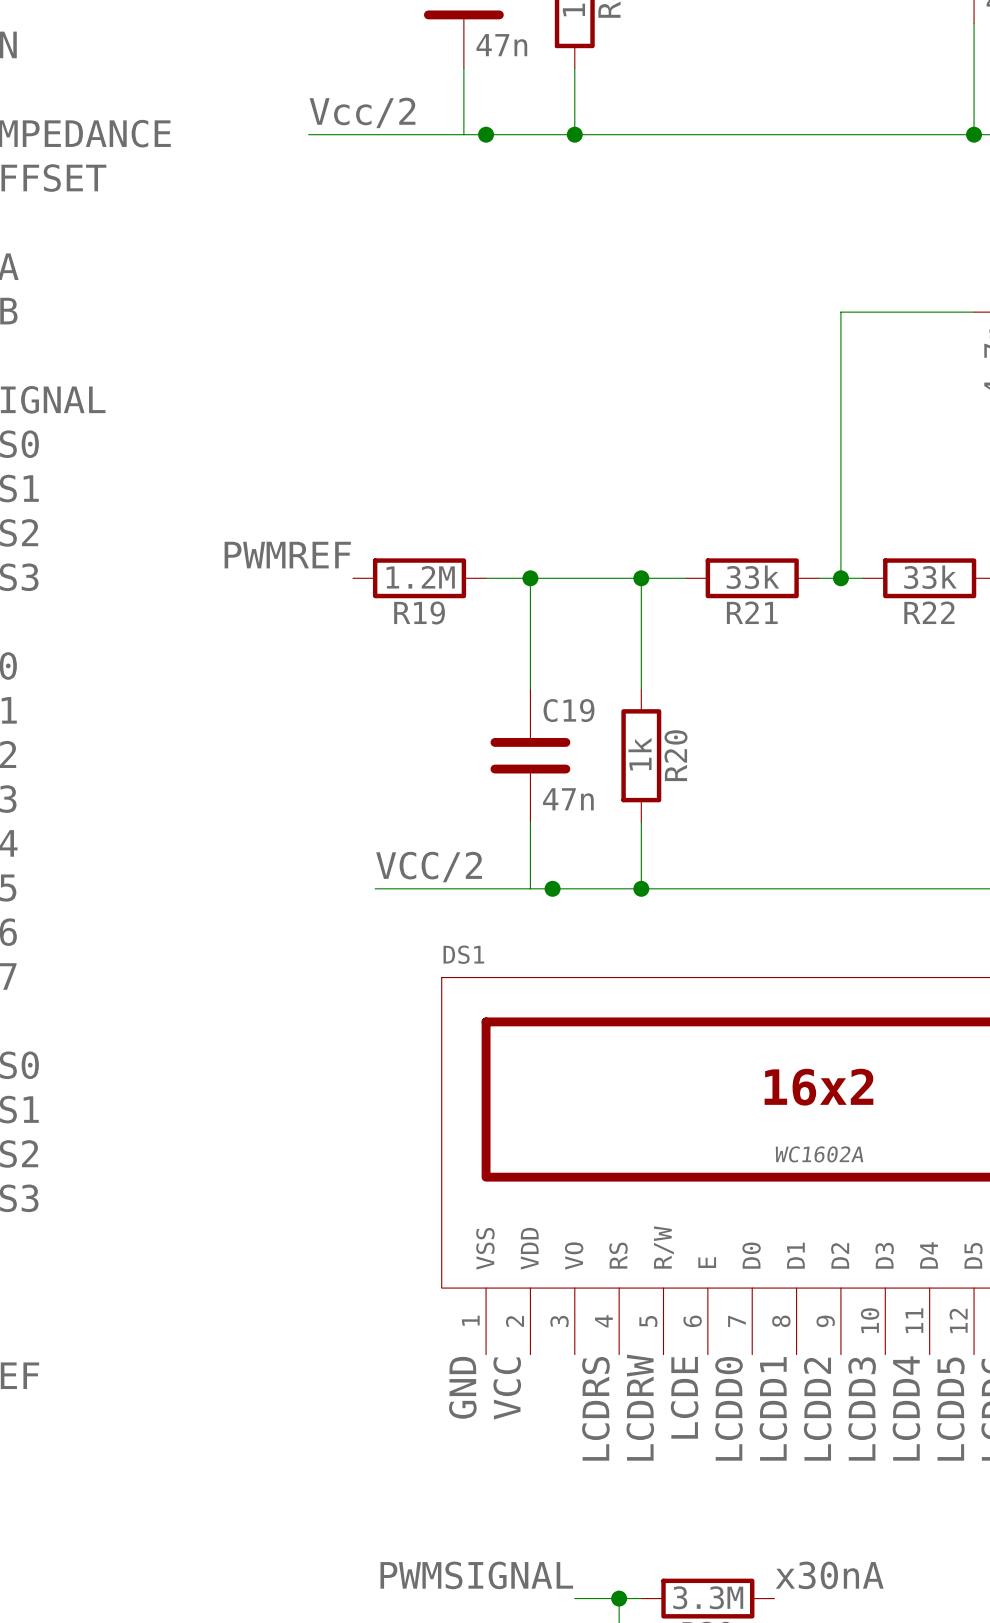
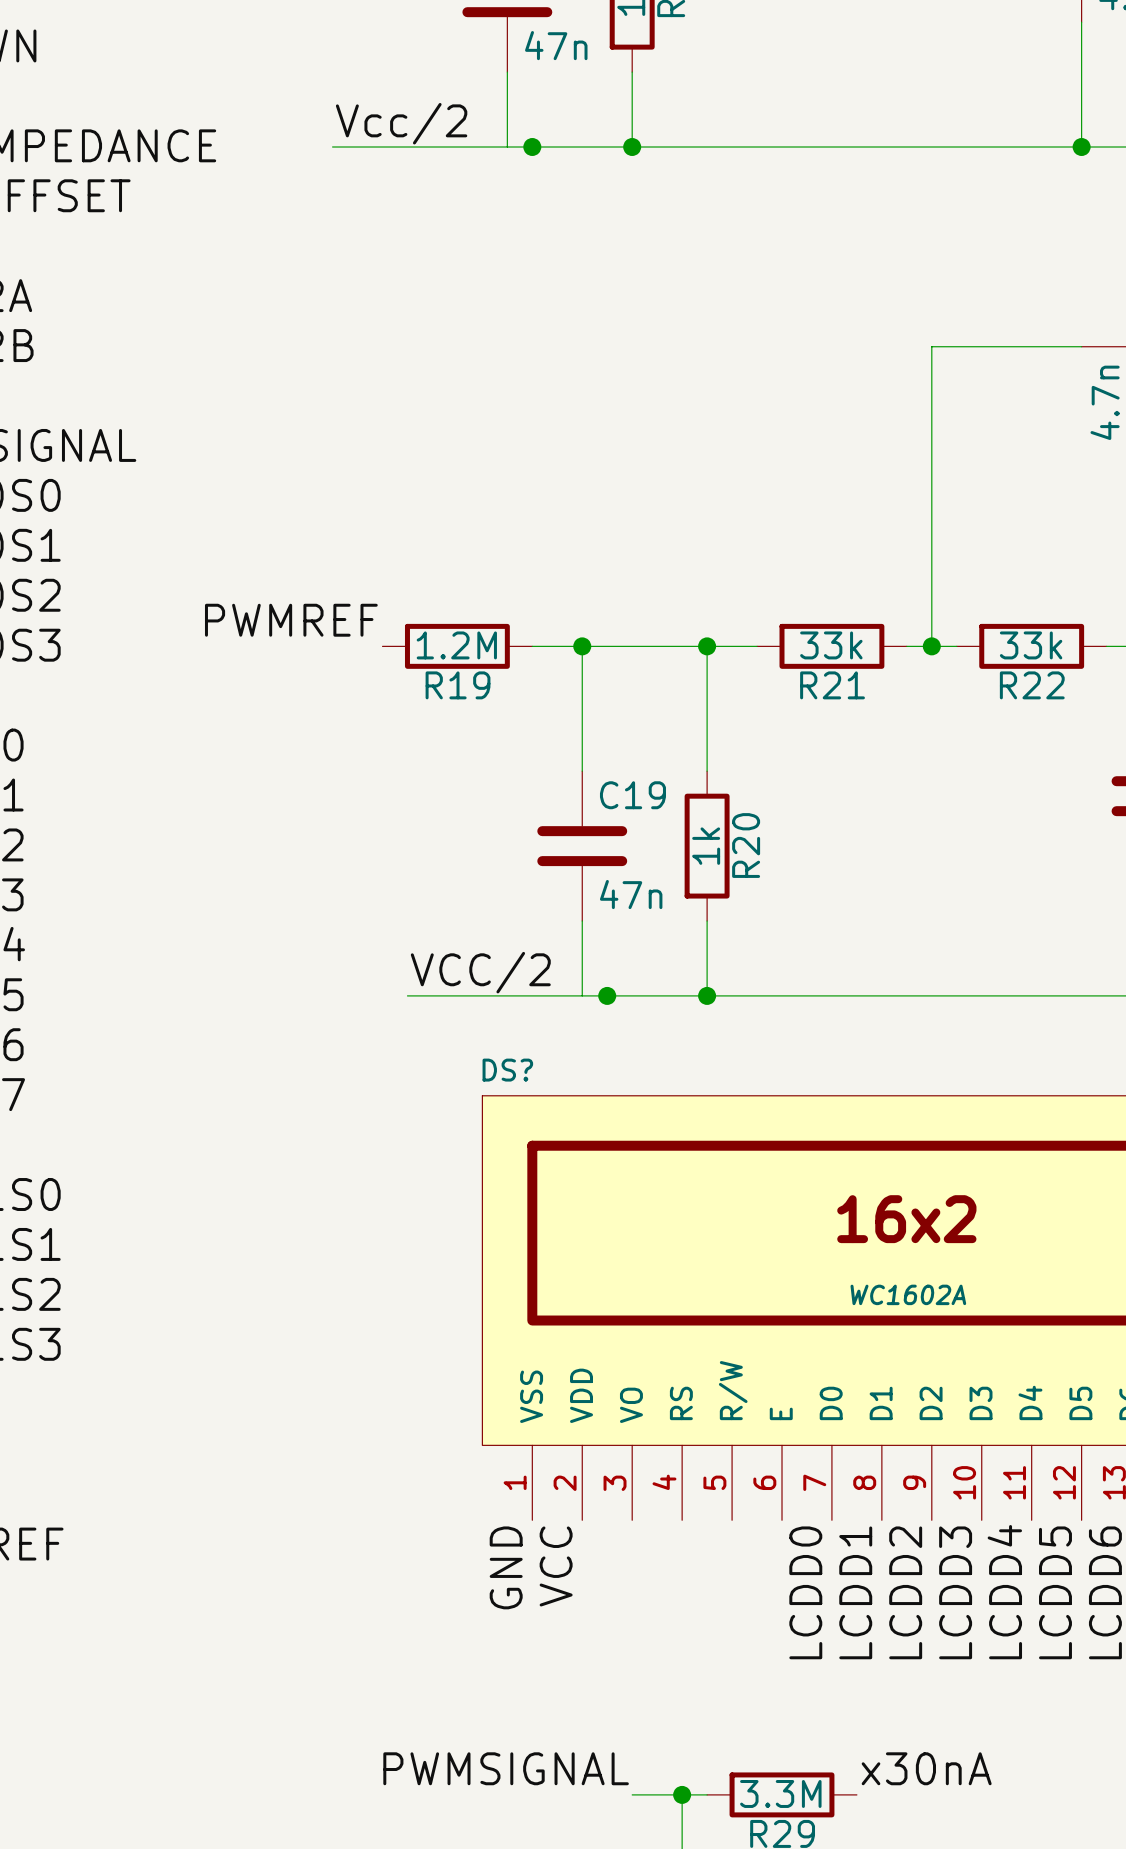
DS1 name: DS1 (463, 954) -> DS? (507, 1070)
label: LCDE (684, 1397) -> none
label: LCDRW (640, 1407) -> none
label: LCDRS (595, 1408) -> none

